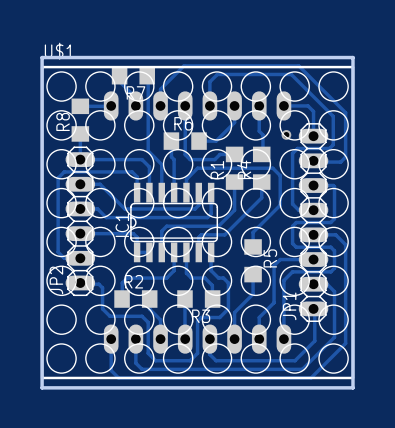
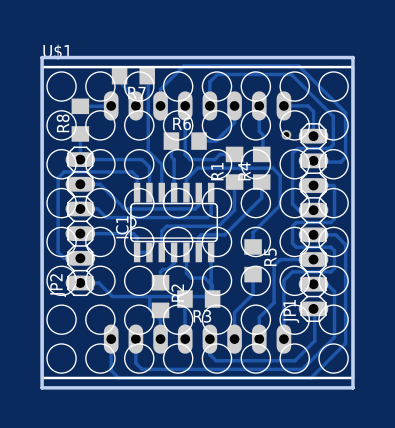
track: (174, 263) (174, 270) (166, 278) (127, 278) (122, 282) (122, 299) -> (174, 263) (167, 269) (163, 269) (160, 271) (160, 282)
track: (211, 270) (218, 278) (223, 278) (228, 282) (228, 308) (219, 317) (201, 317) (197, 321) (197, 353) (190, 360) (155, 360) (148, 353) (148, 322) (142, 316) (109, 316) (102, 308) (102, 287) (98, 284) (80, 282) -> (211, 270) (211, 290) (204, 296) (112, 296) (98, 282) (80, 282)
R2 rotation: 0° (135, 299) -> 90° clockwise (160, 296)

